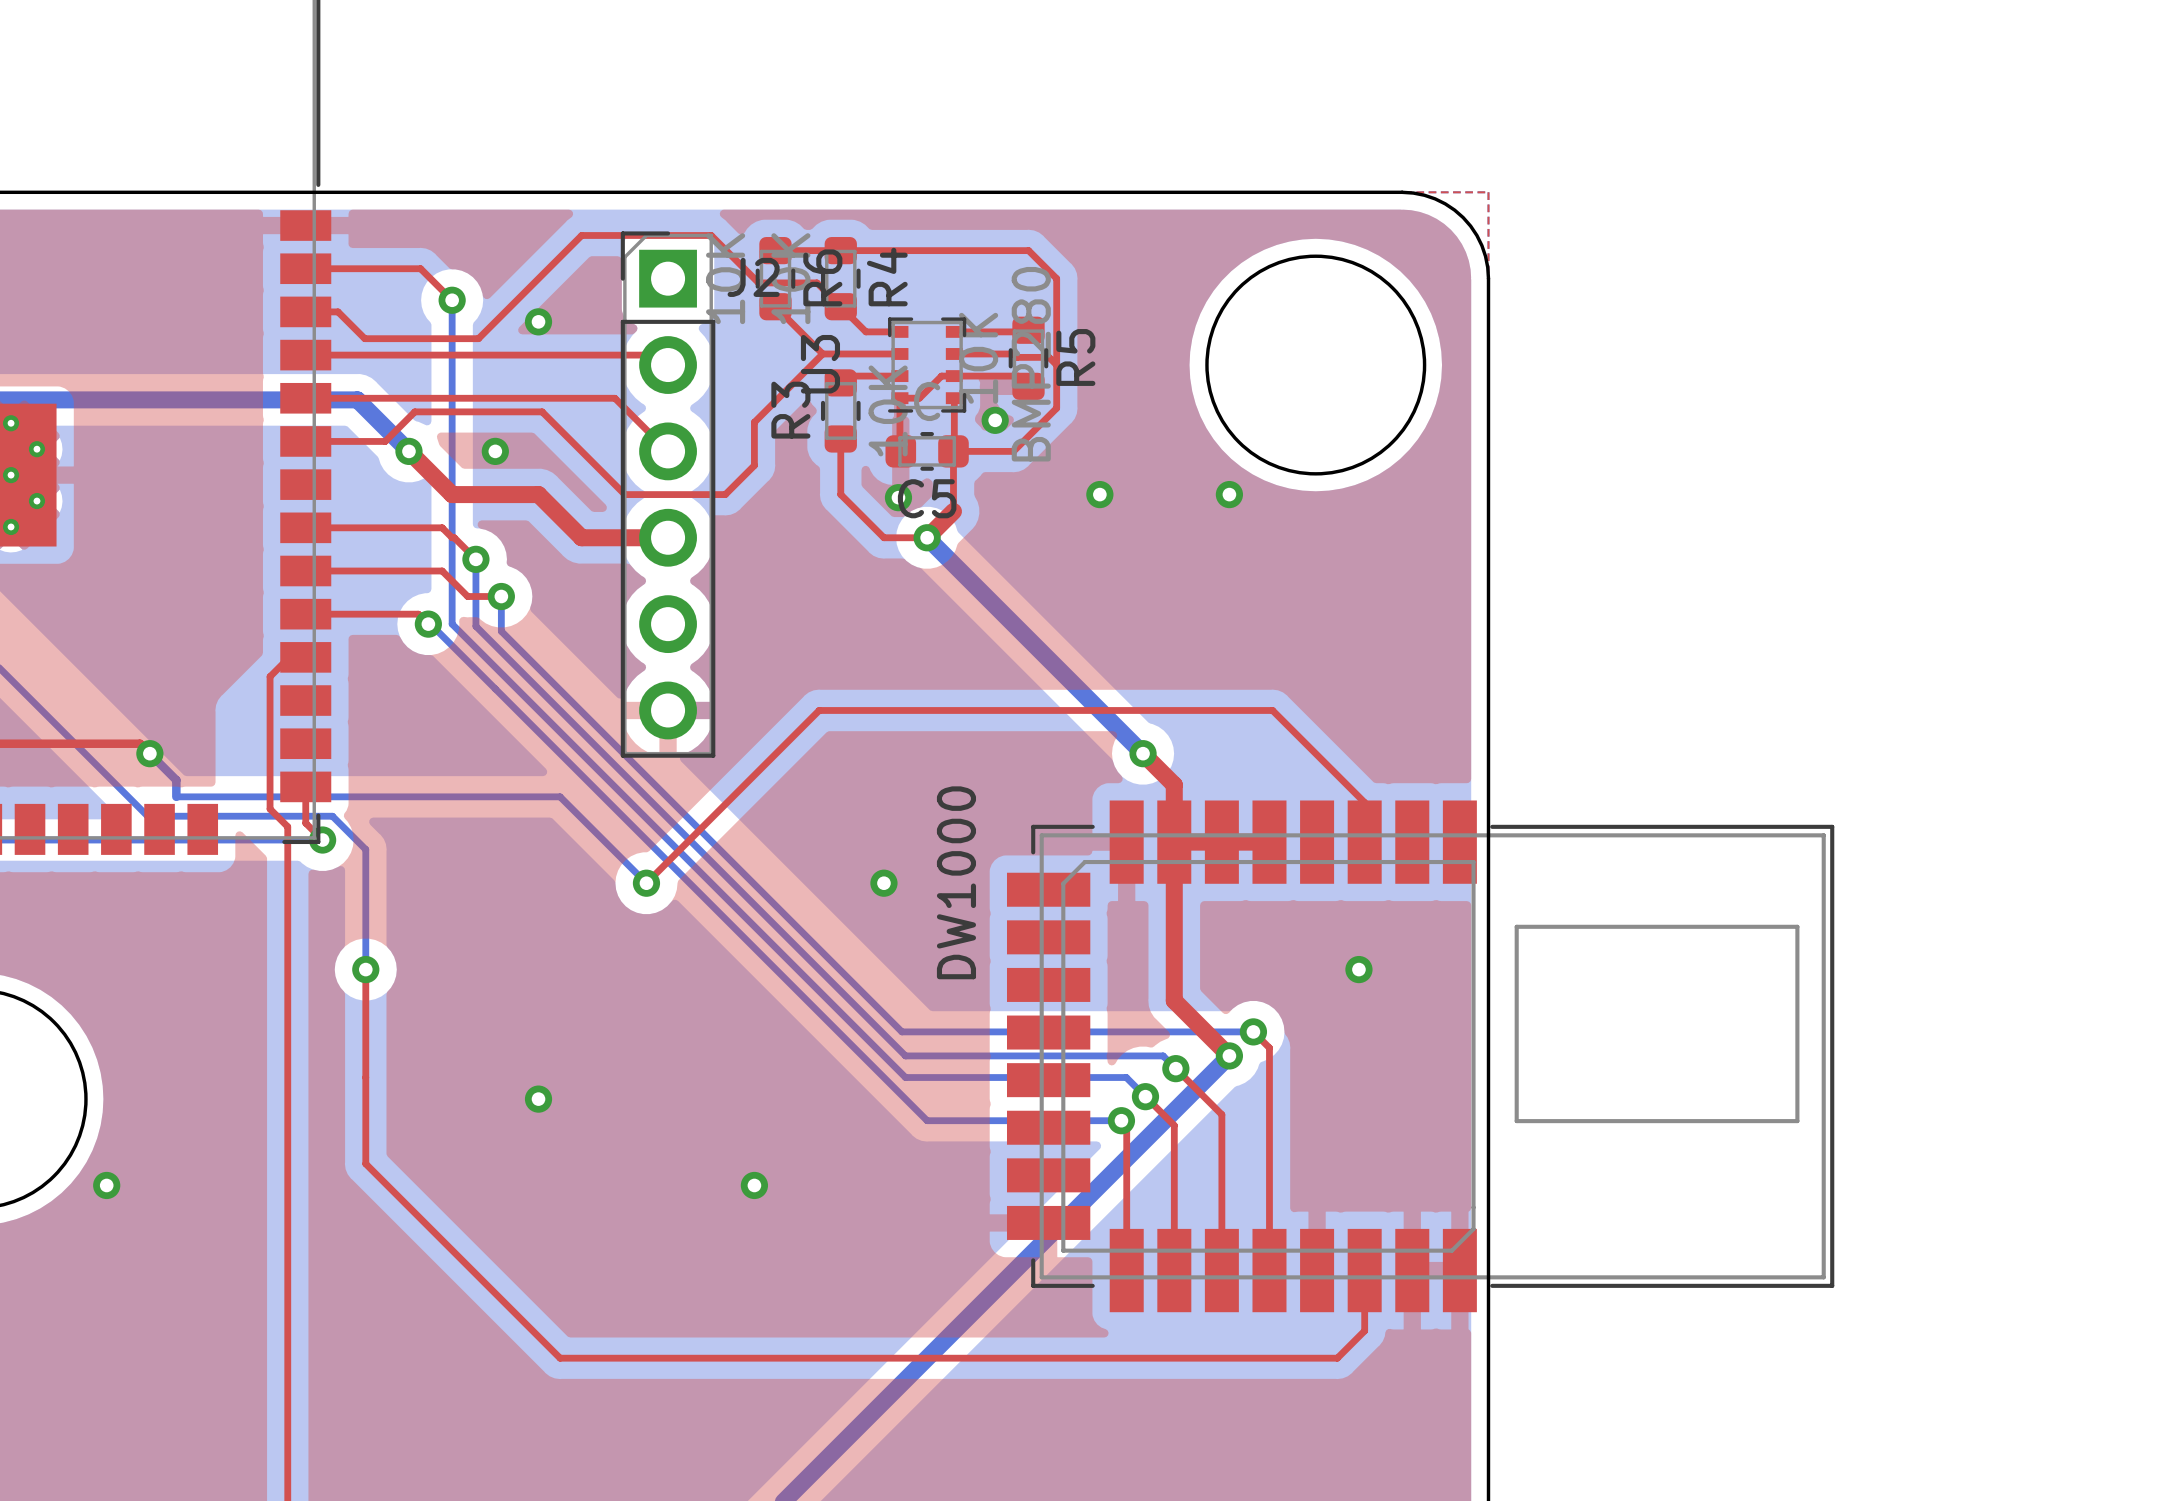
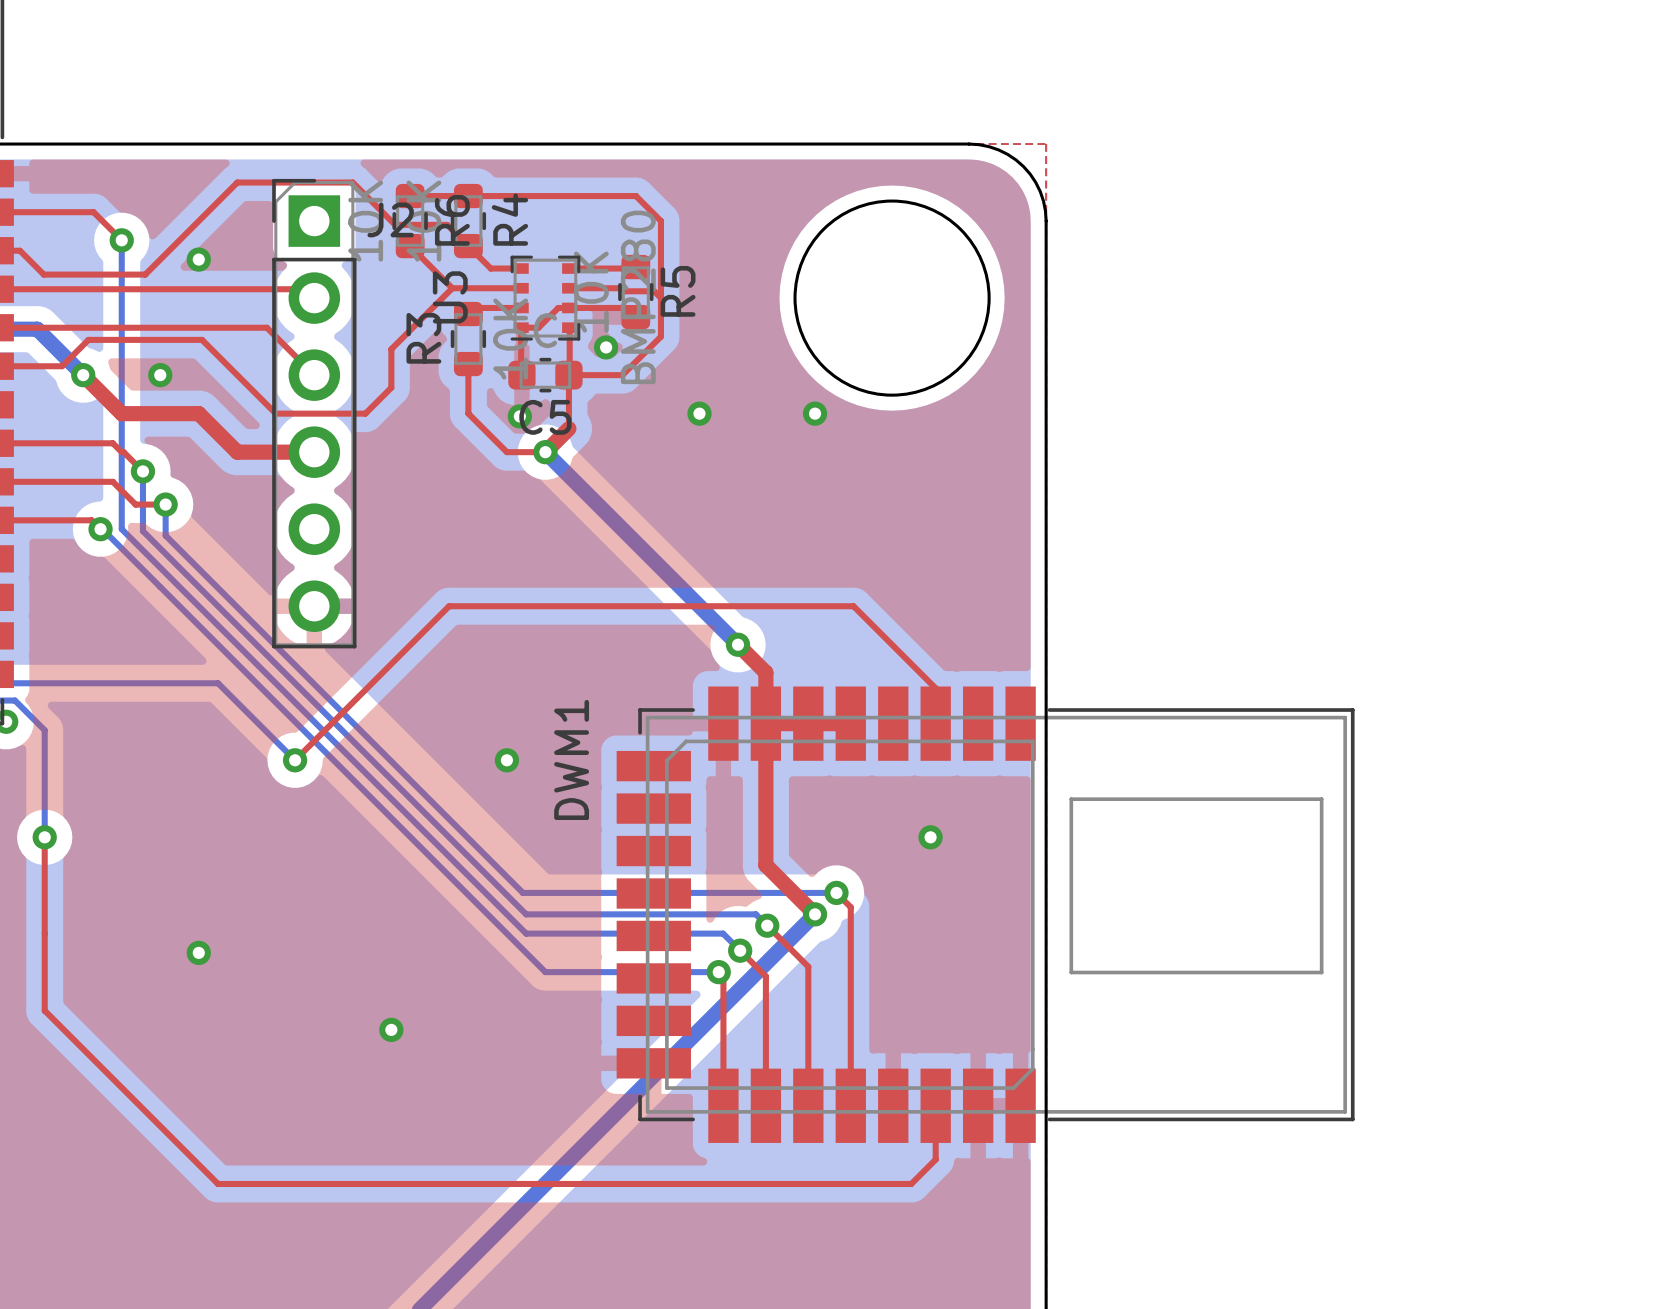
DW1000 name: DW1000 (956, 882) -> DWM1 (571, 759)

